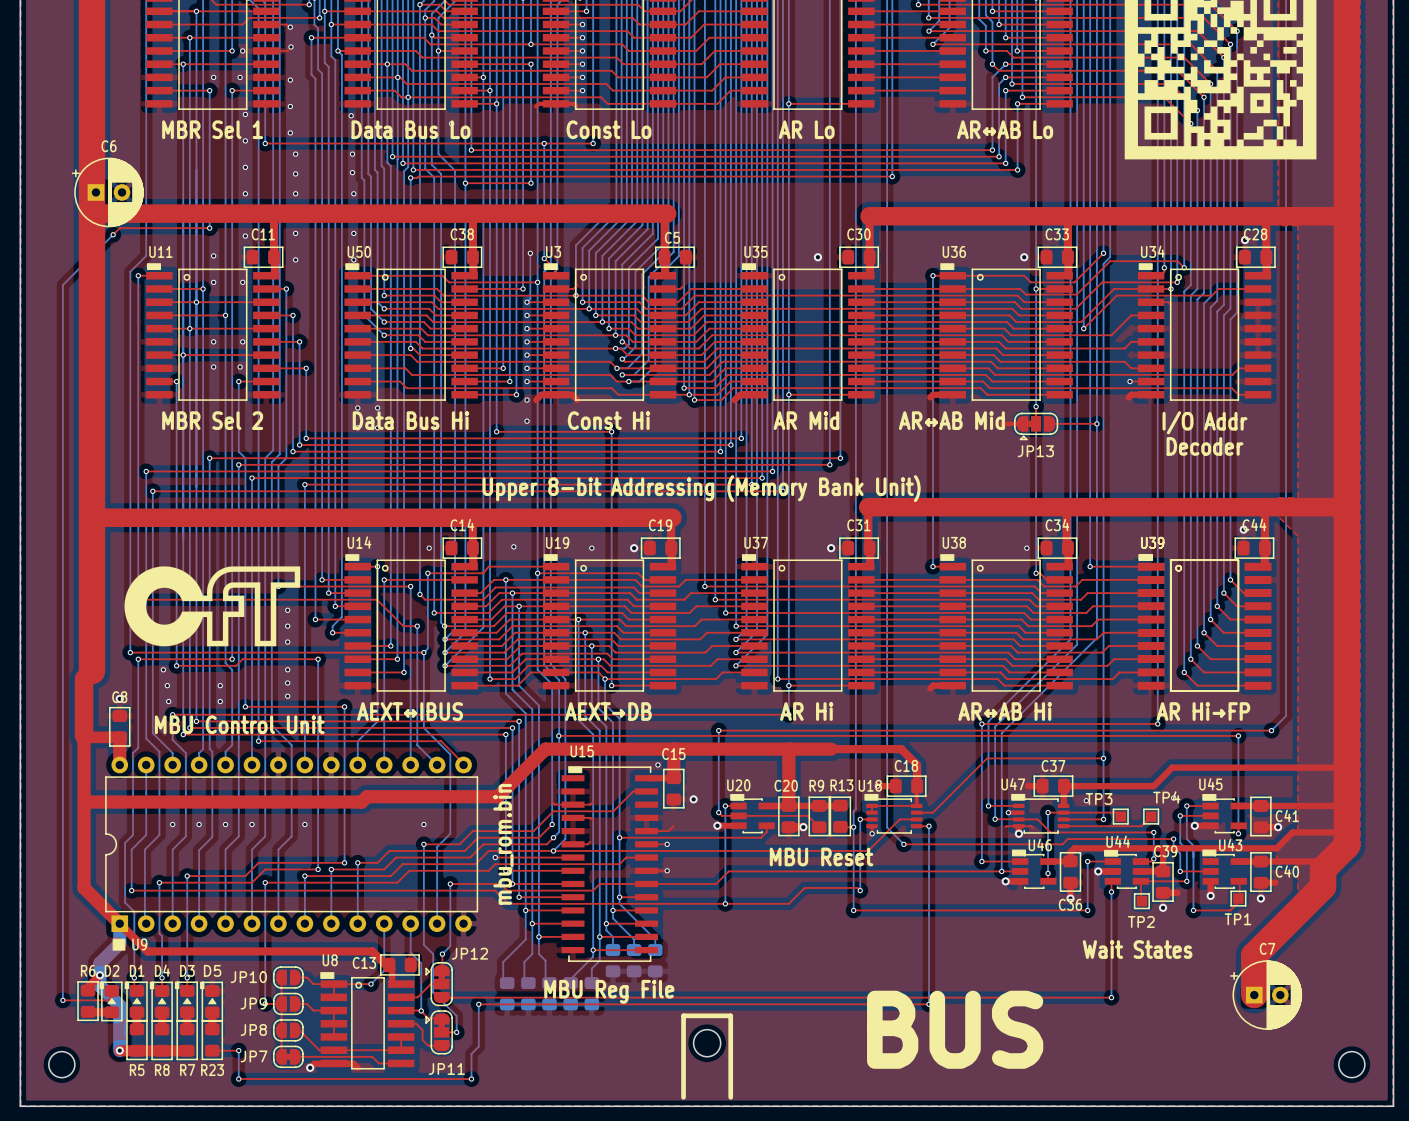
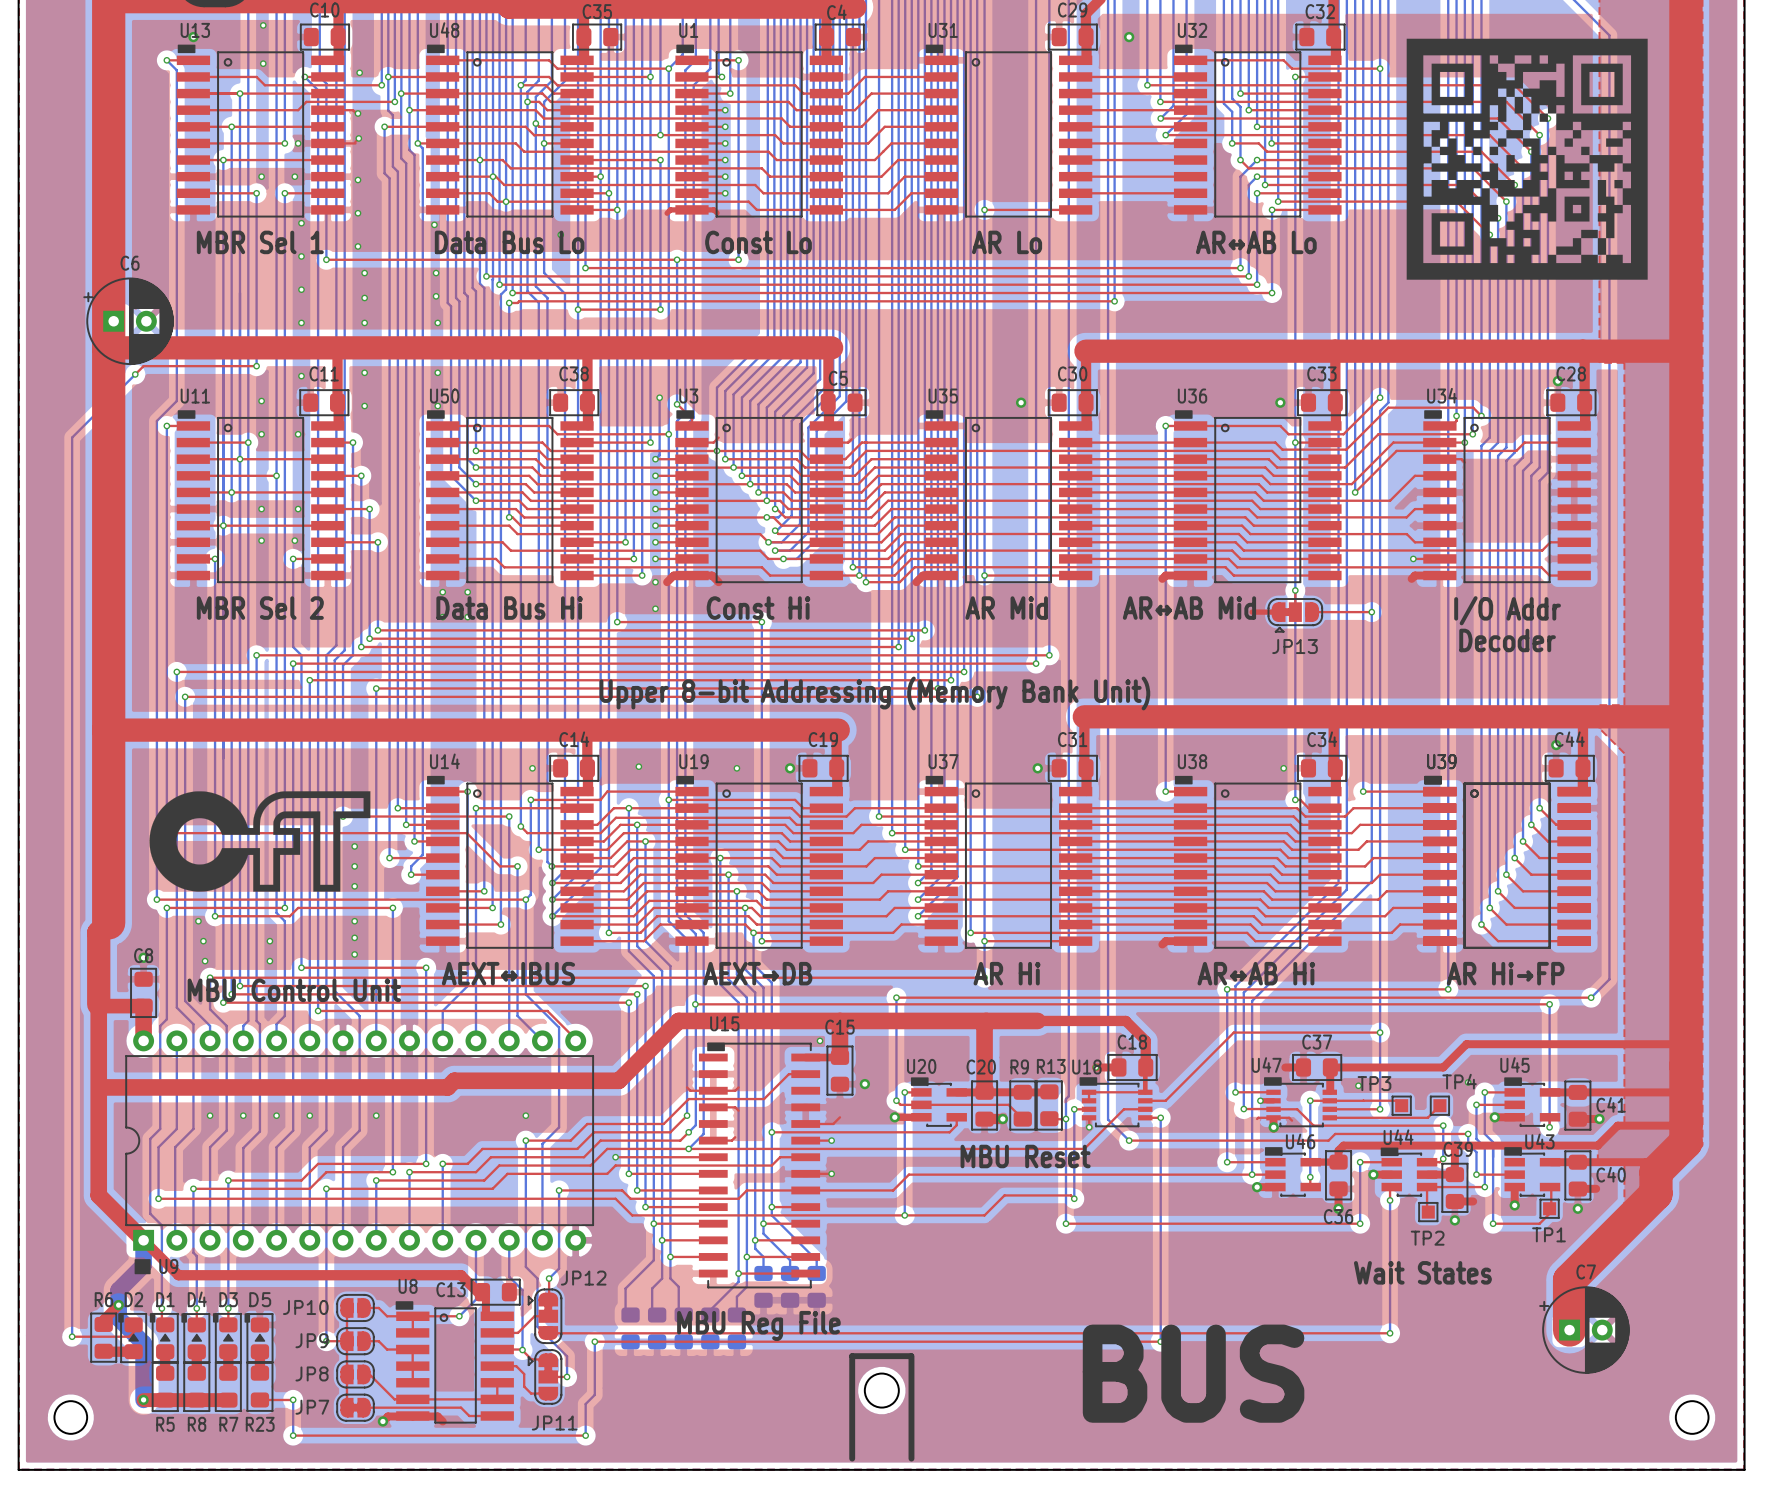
text: mbu_rom.bin (503, 844) -> none

